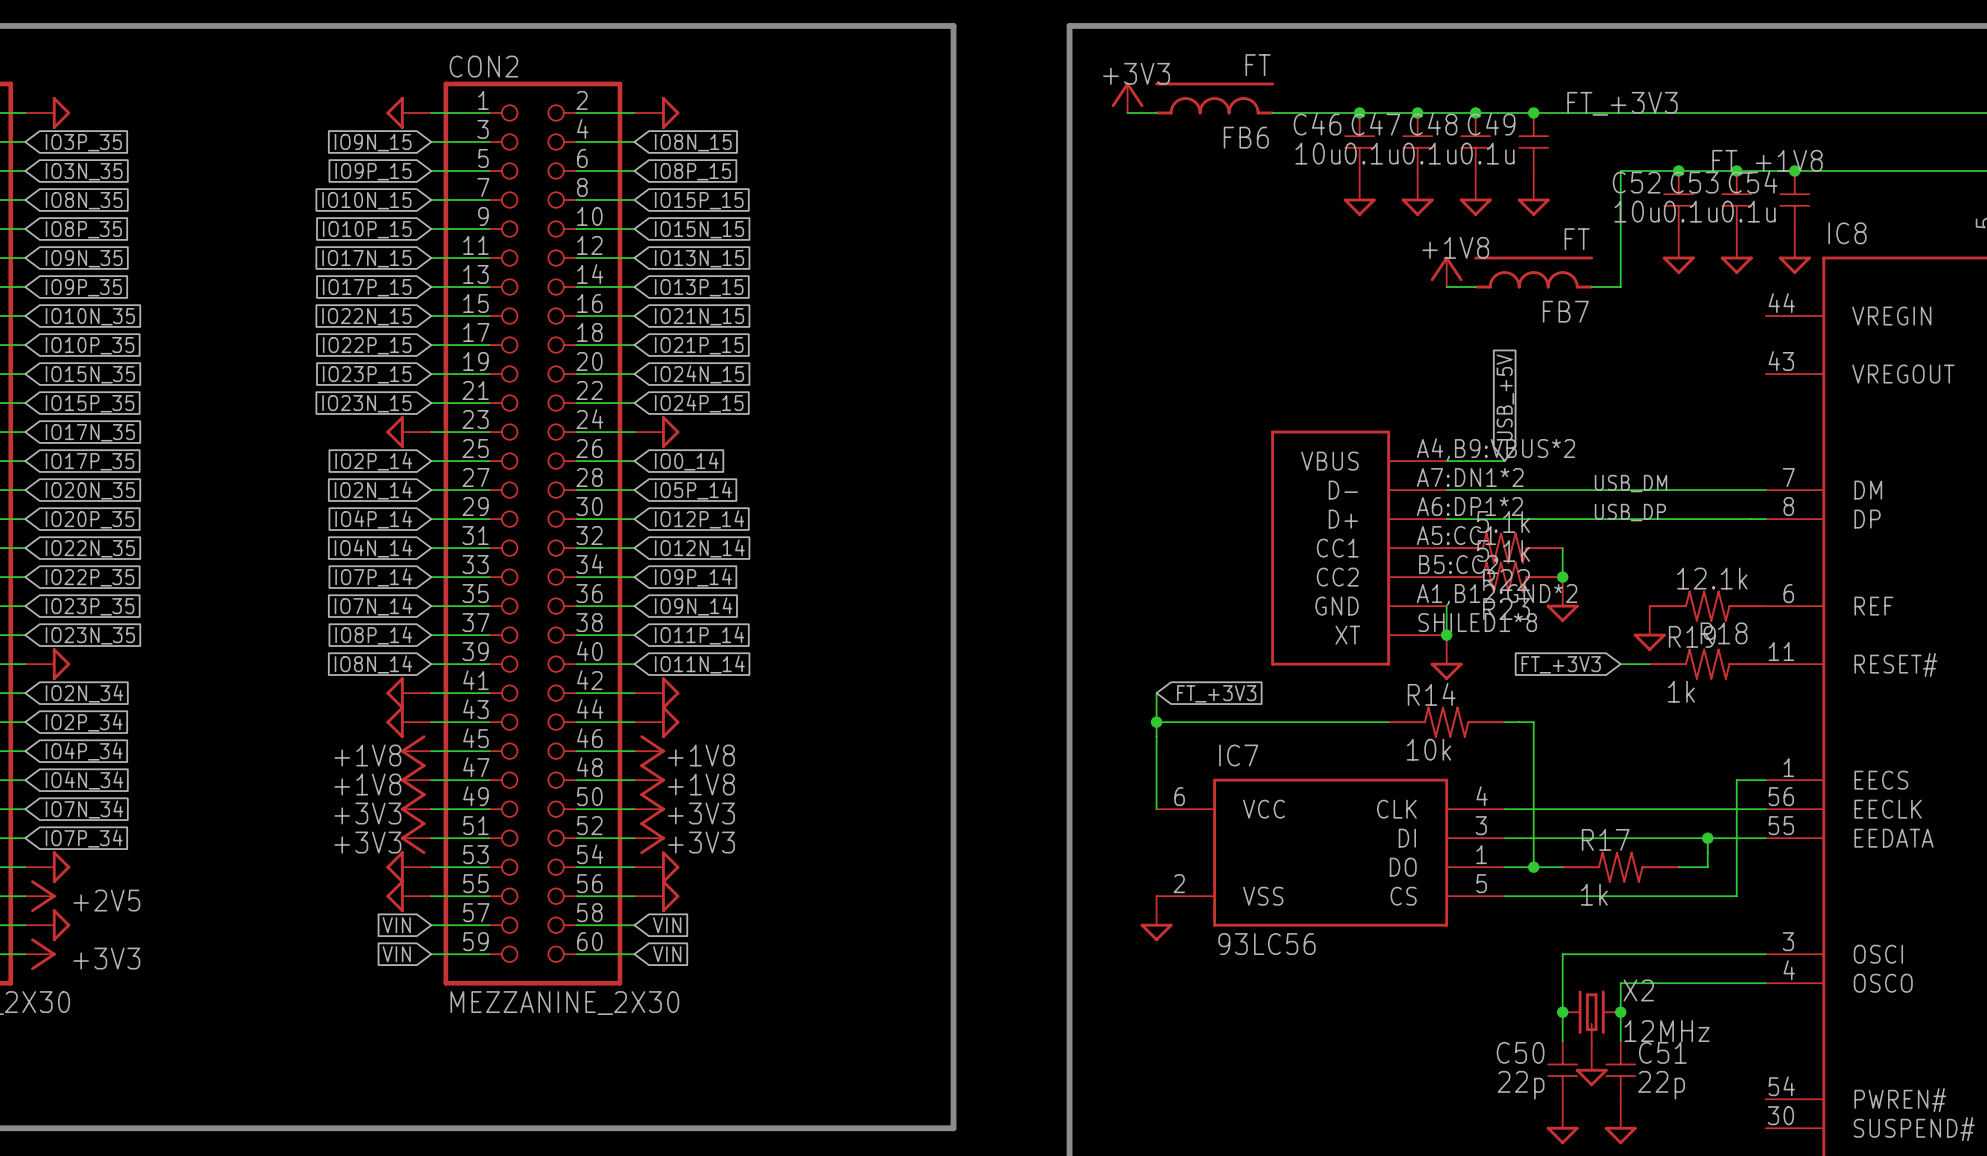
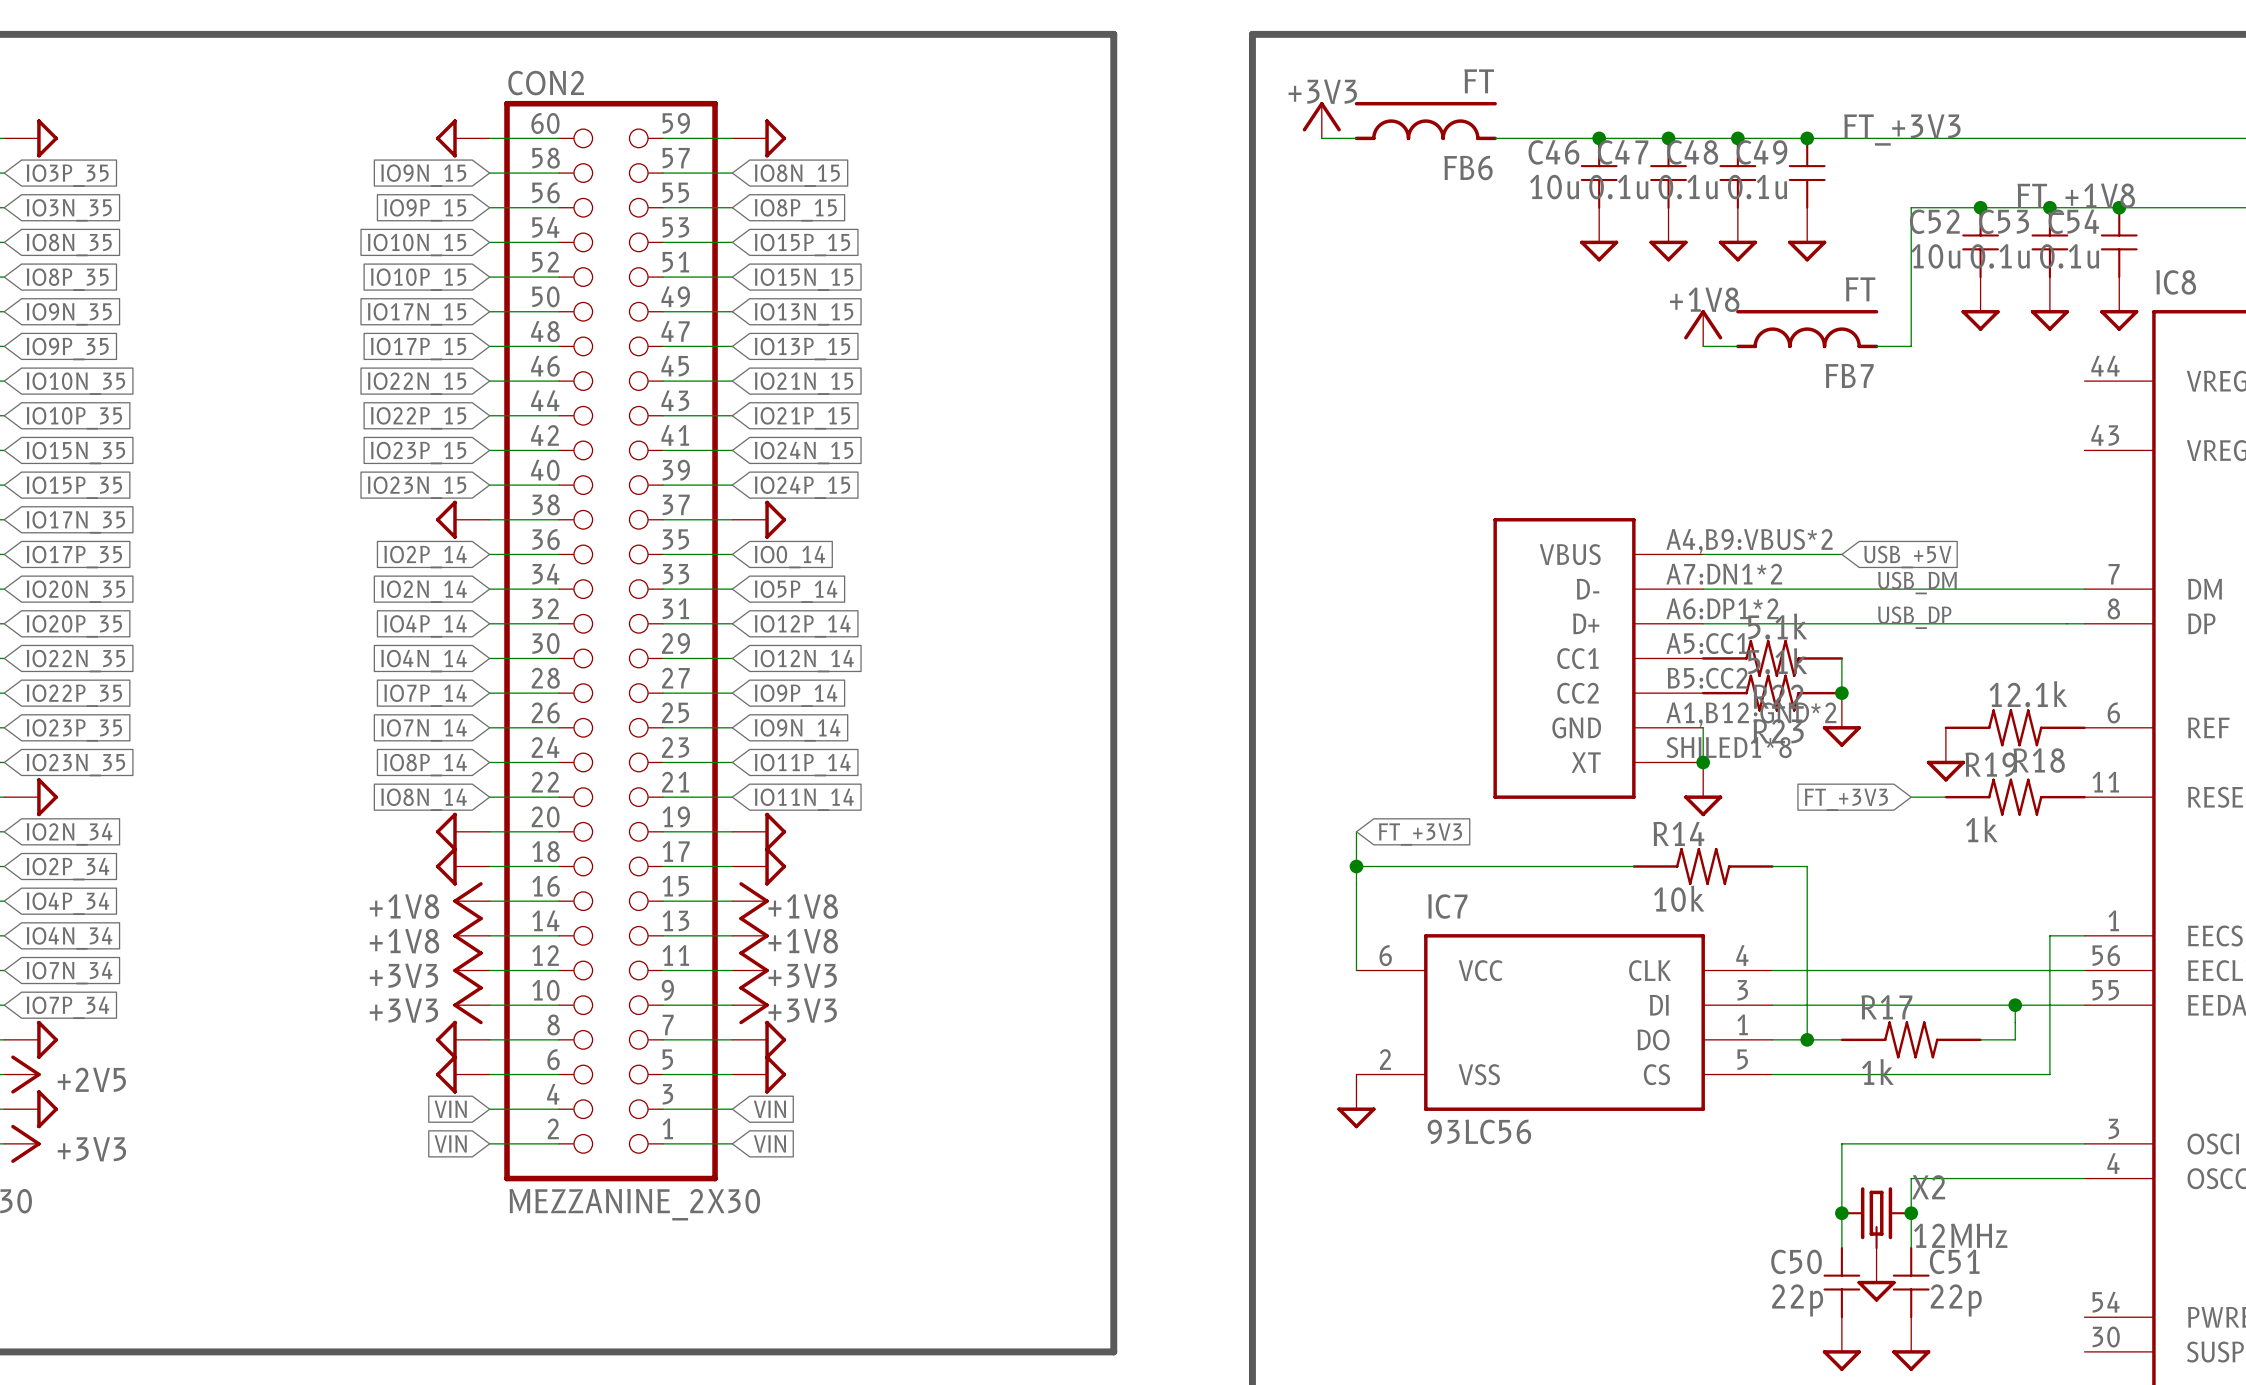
global label rotation: 0° (1505, 397) -> 90° clockwise (1907, 557)
global label position: USB_+5V (1505, 397) -> USB_+5V (1907, 557)
wire: none -> (1772, 554) (1841, 554)
CON2 rotation: 0° (532, 533) -> 180° (611, 641)

